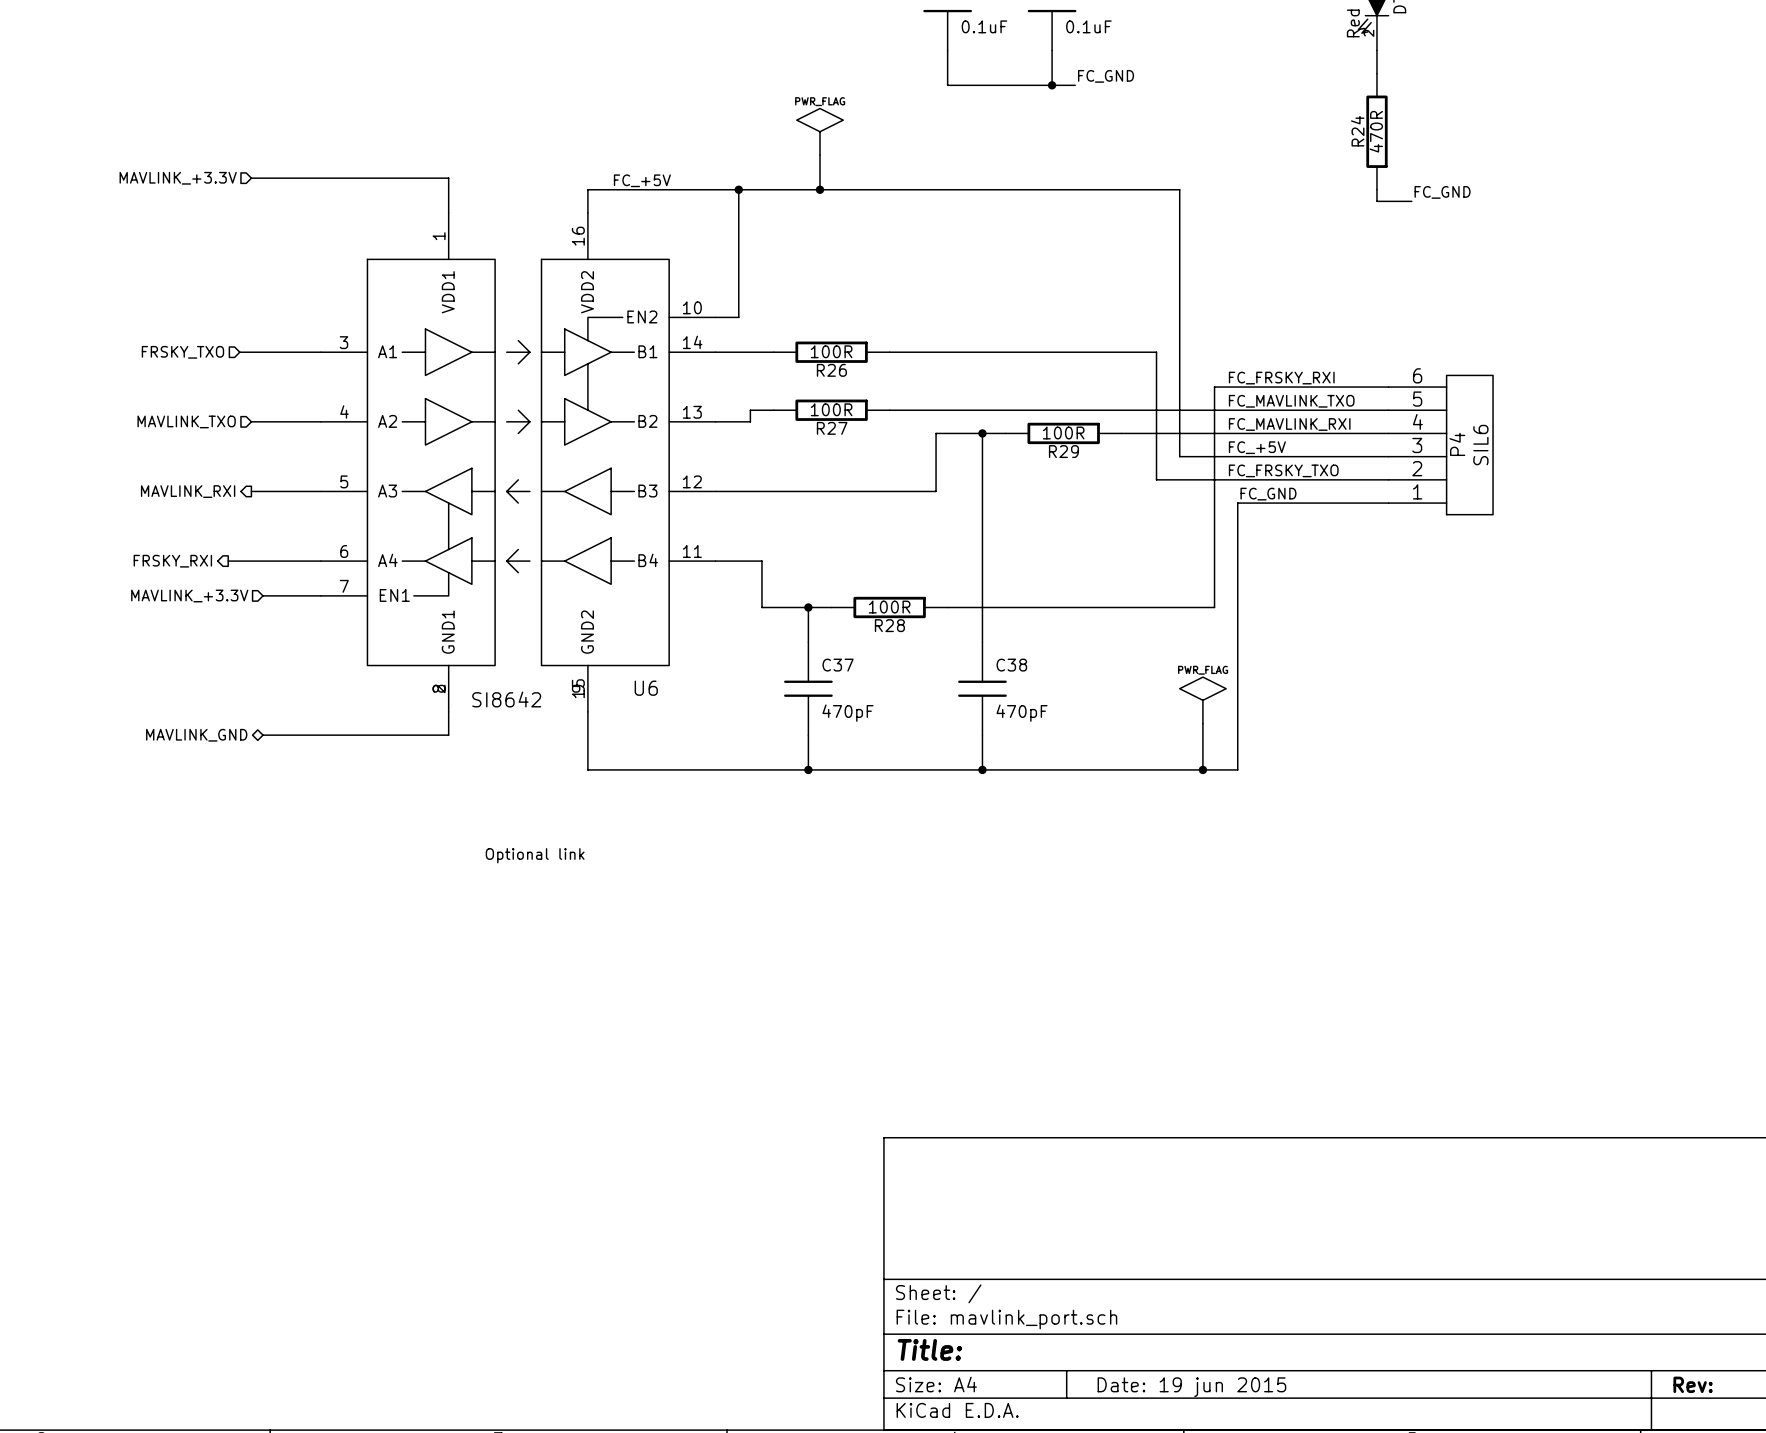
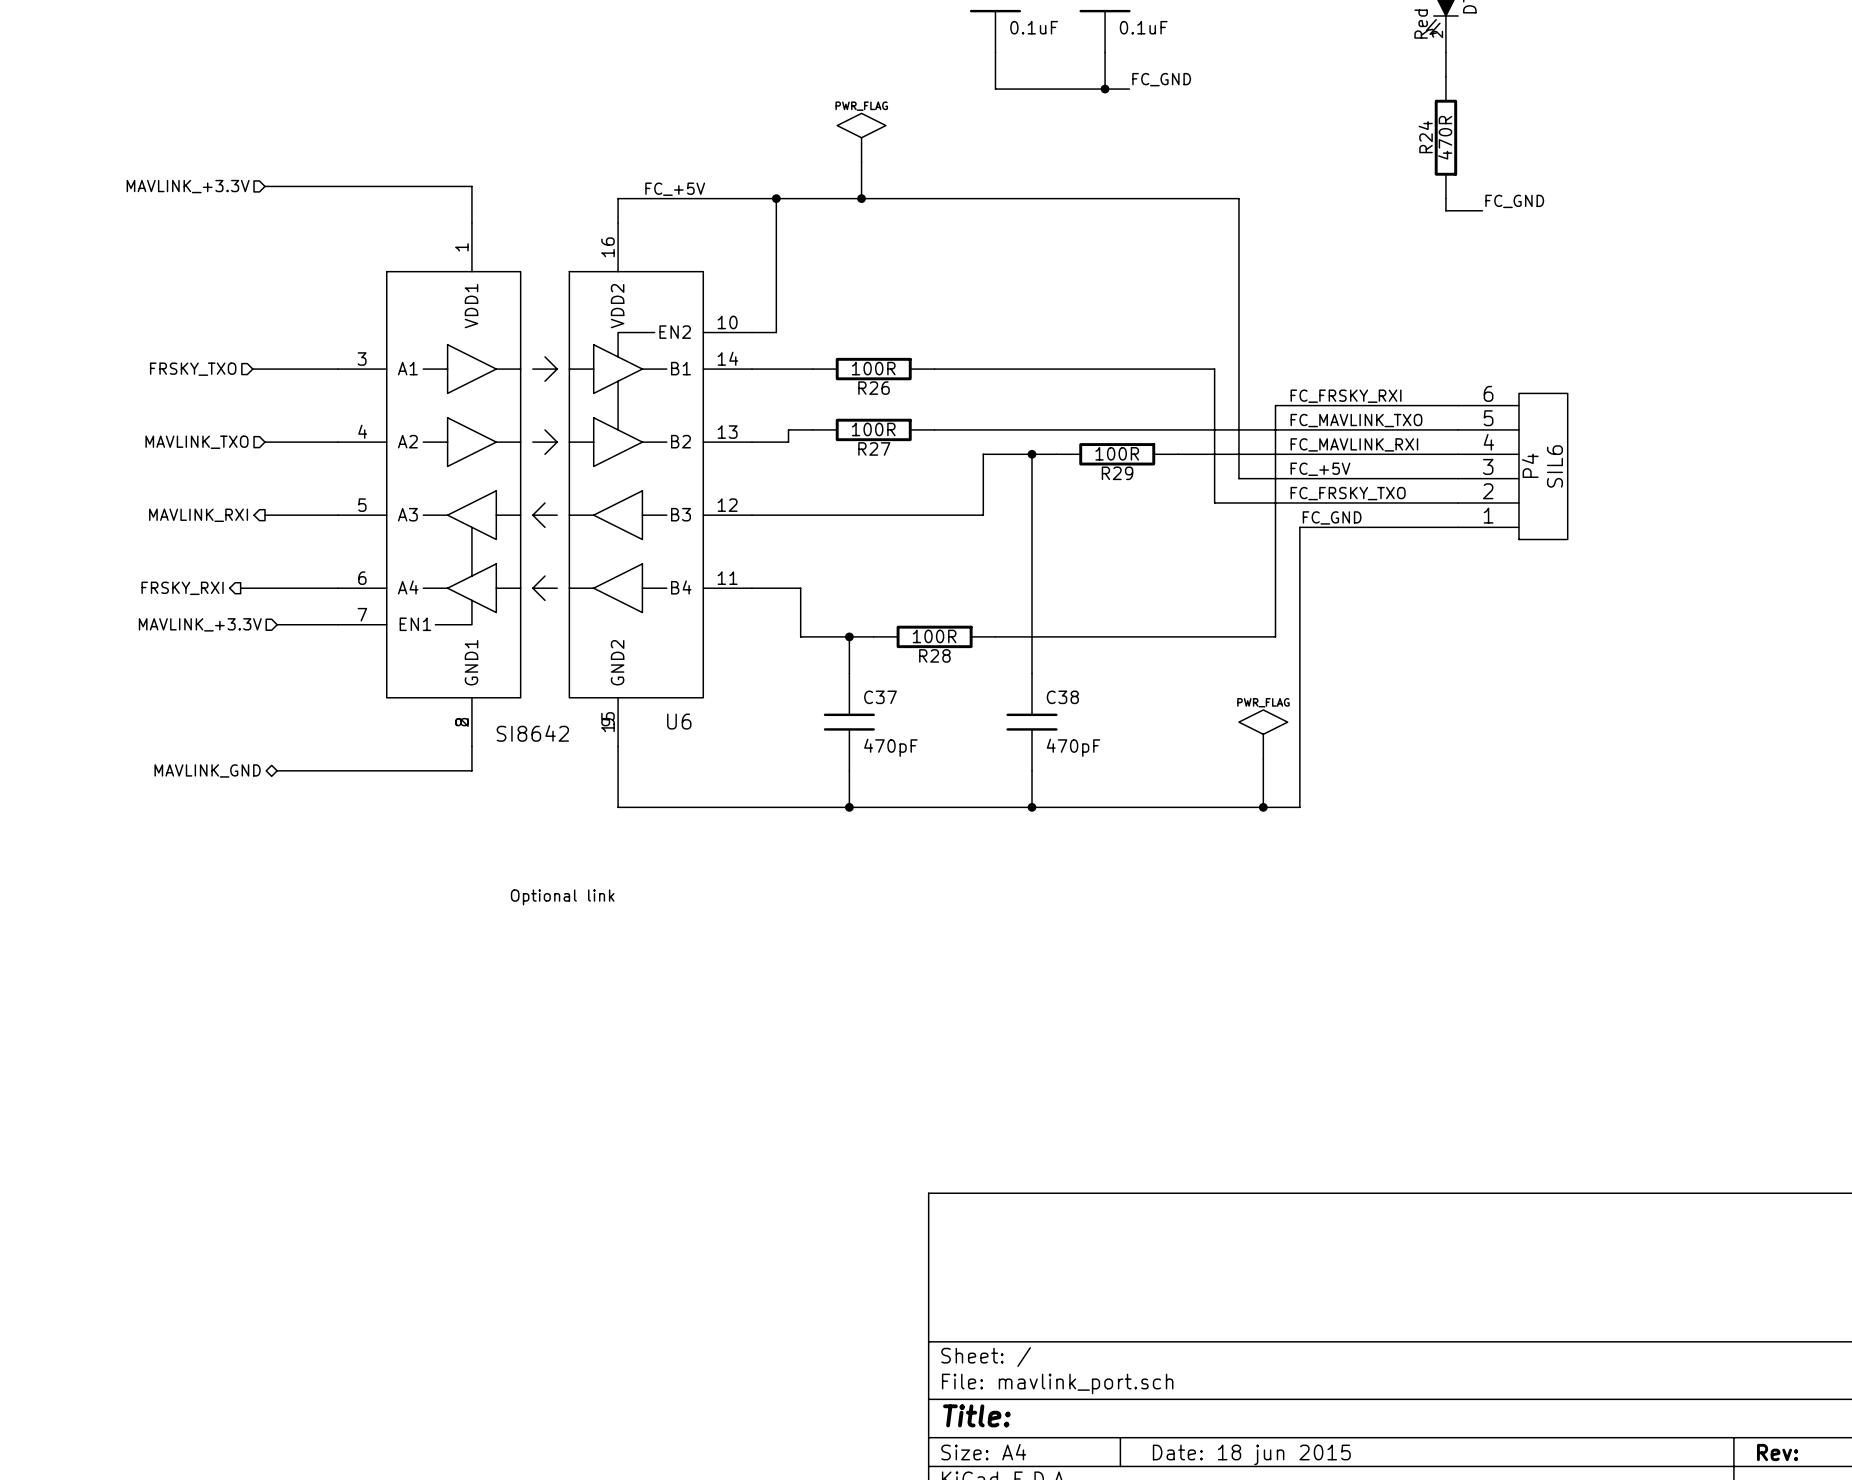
title block: Date: 19 jun 2015 (1191, 1387) -> Date: 18 jun 2015 (1251, 1454)

